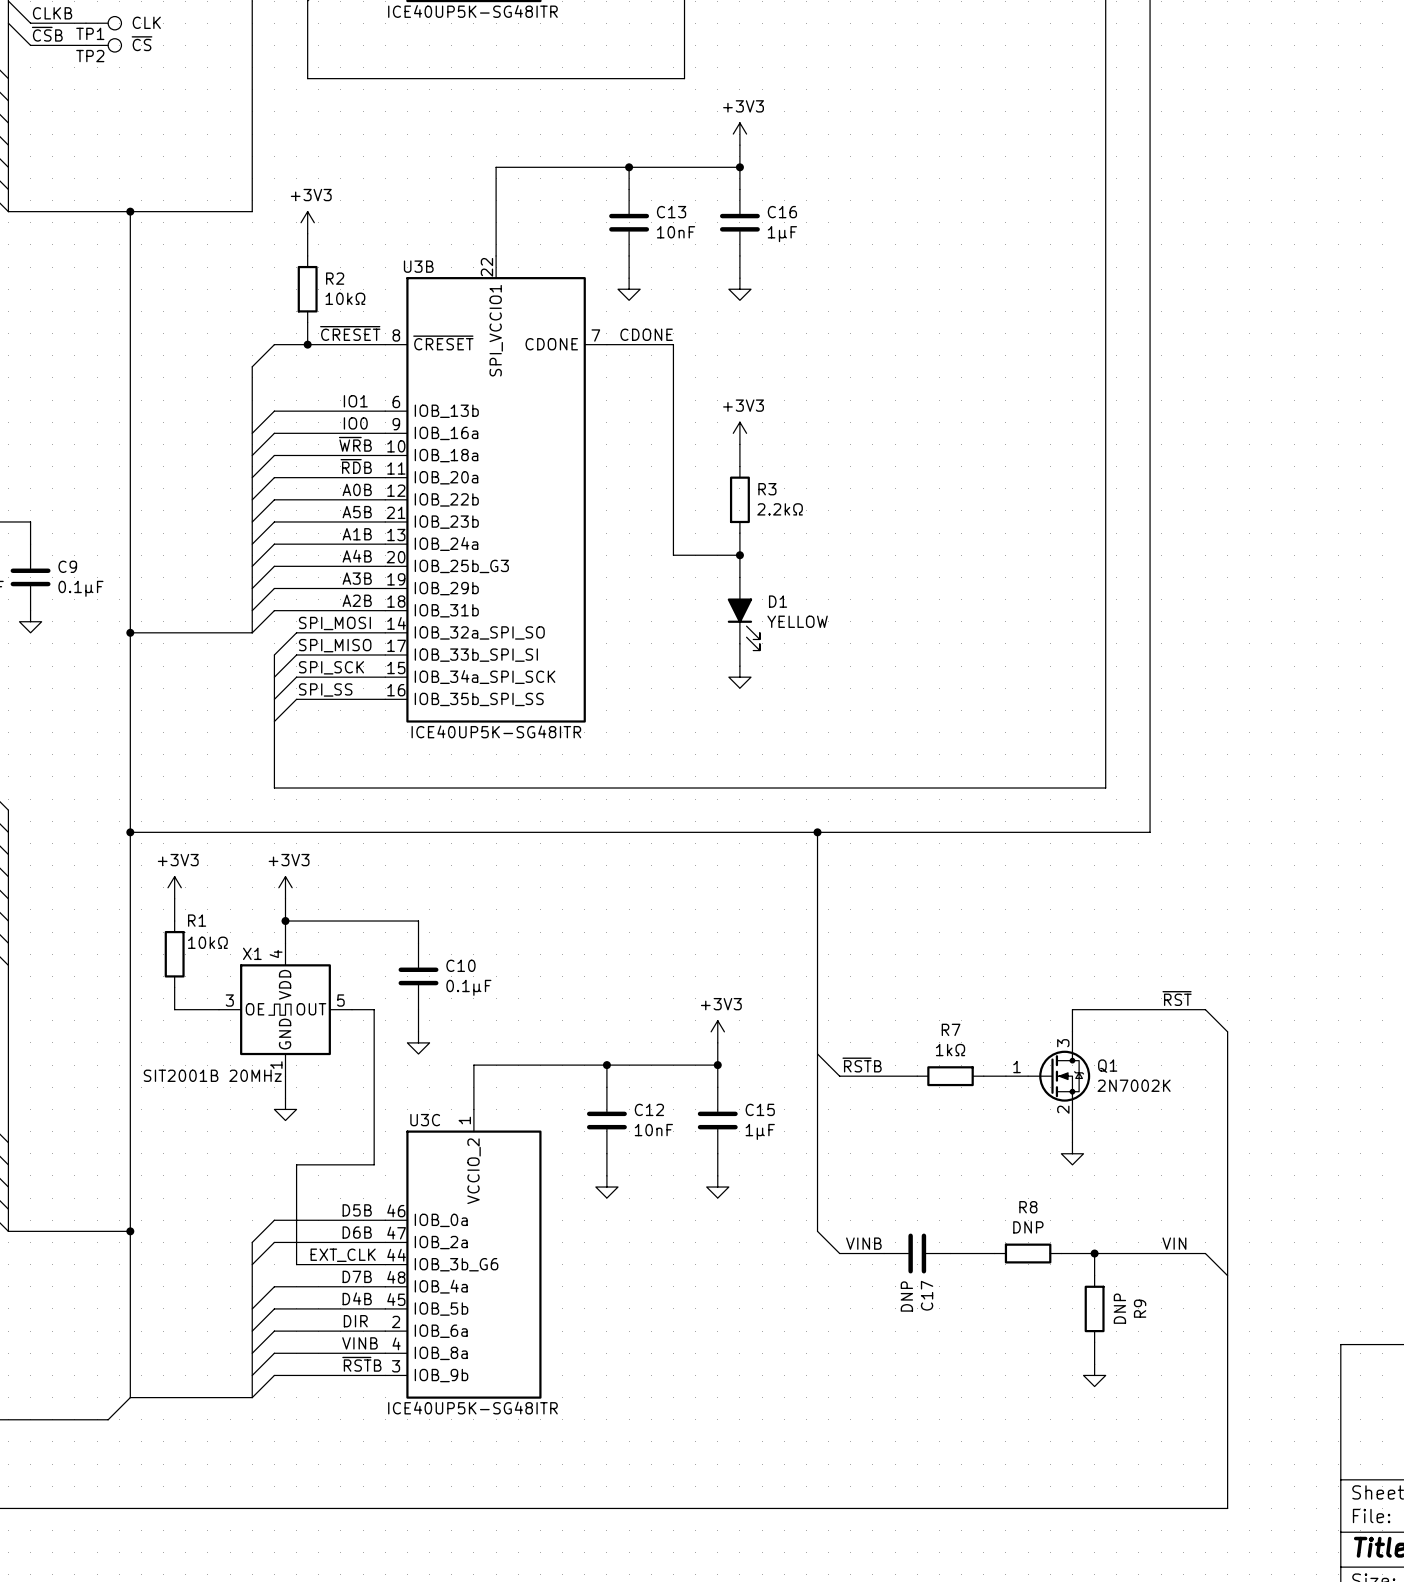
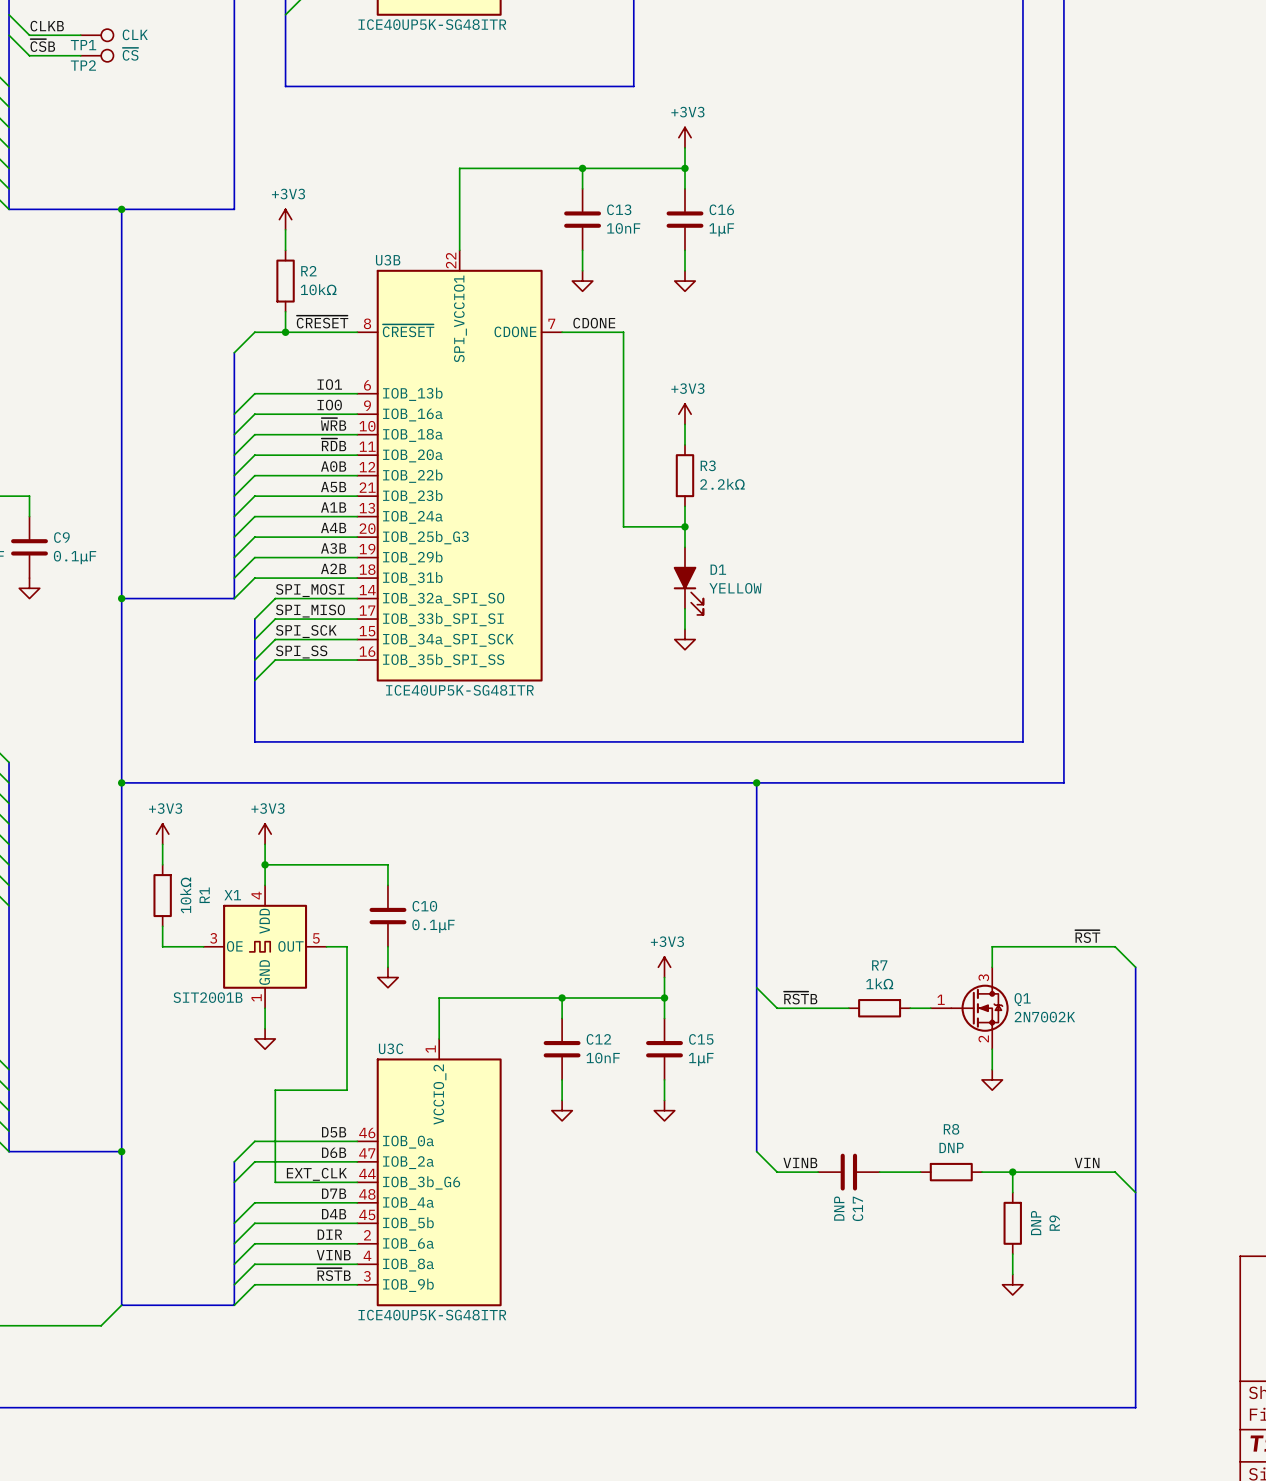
R1 name rotation: 0° (197, 920) -> 90° counterclockwise (204, 895)
R1 name position: R1 (197, 920) -> R1 (204, 895)
R1 value rotation: 0° (207, 942) -> 90° counterclockwise (185, 895)
X1 value: SIT2001B 20MHz (212, 1075) -> SIT2001B (208, 997)

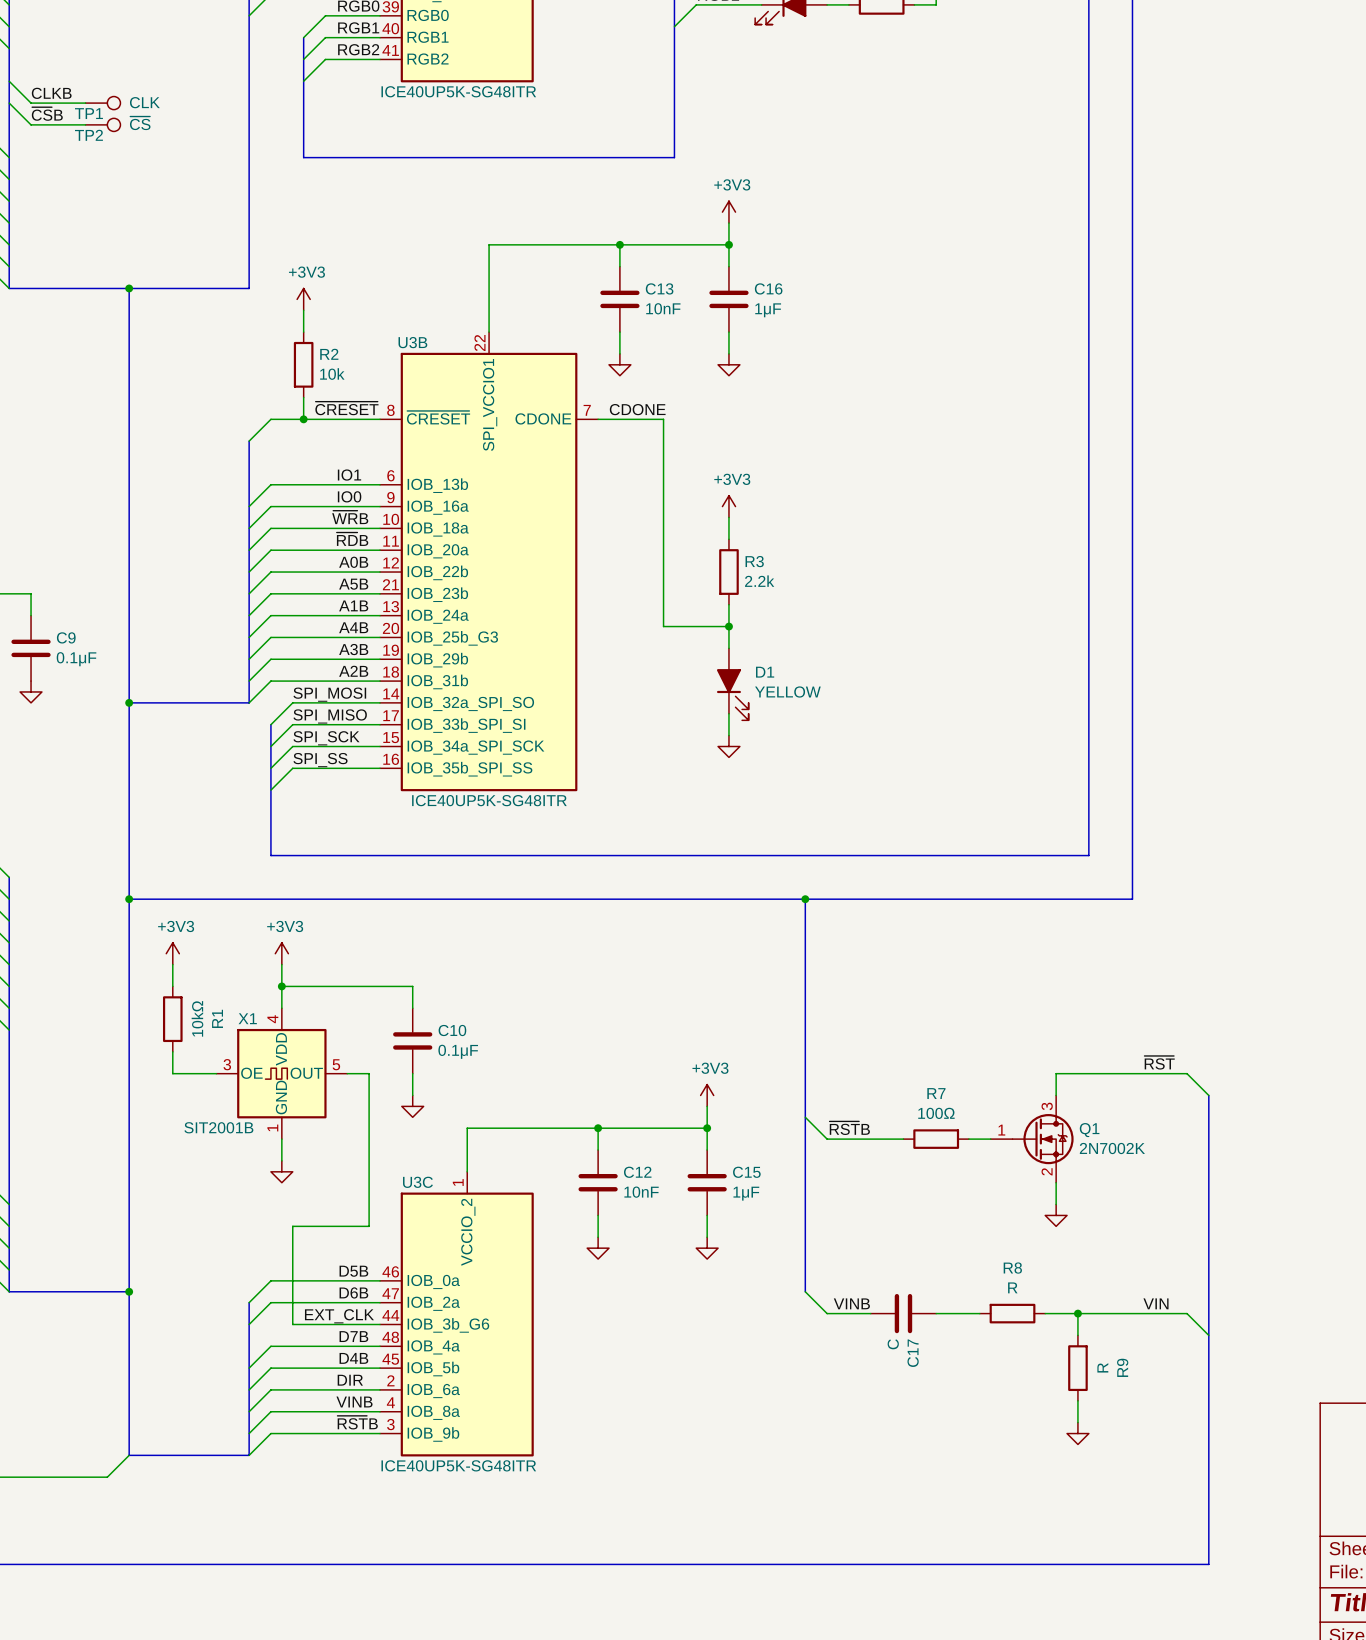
R2 value: 10kΩ (318, 289) -> 10k (332, 374)
R3 value: 2.2kΩ (722, 484) -> 2.2k (759, 581)
R7 value: 1kΩ (879, 983) -> 100Ω (936, 1113)
R8 value: DNP (951, 1147) -> R (1012, 1287)
C17 value: DNP (839, 1208) -> C (893, 1344)
R9 value: DNP (1036, 1223) -> R (1102, 1367)

